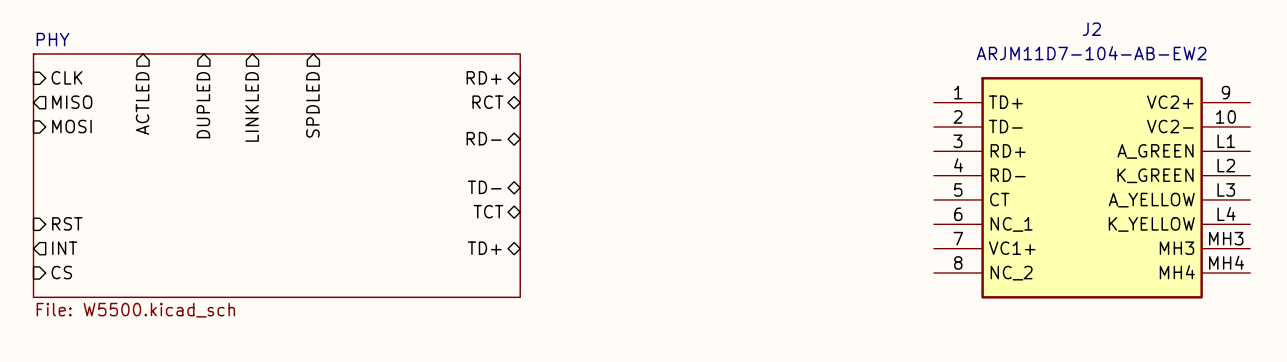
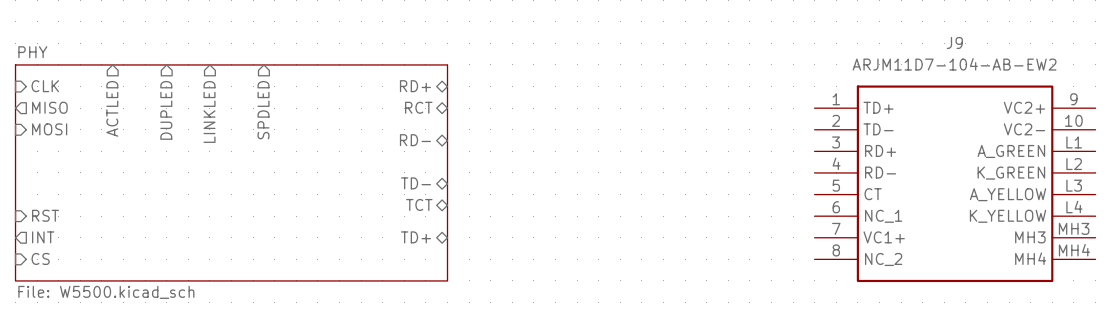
J2 name: J2 (1091, 29) -> J9 (954, 42)

